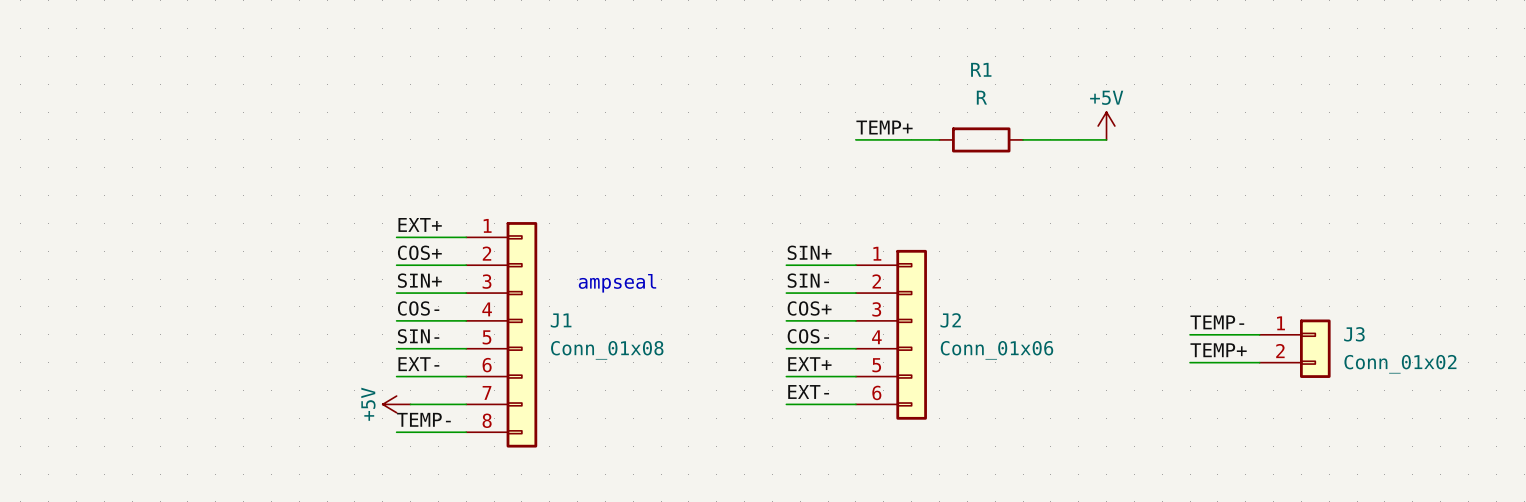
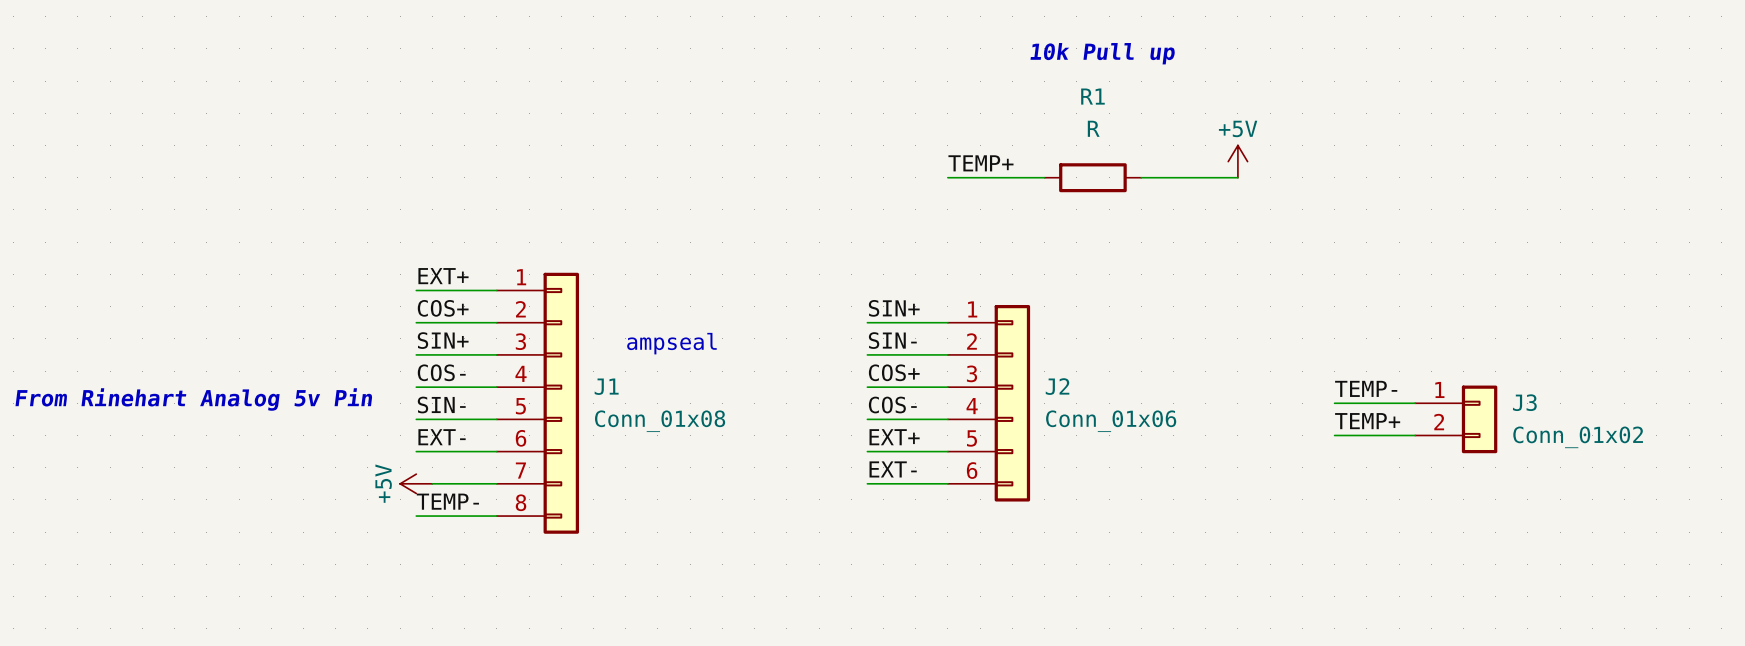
text: none -> 10k Pull up (1102, 53)
text: none -> From Rinehart Analog 5v Pin (193, 399)

